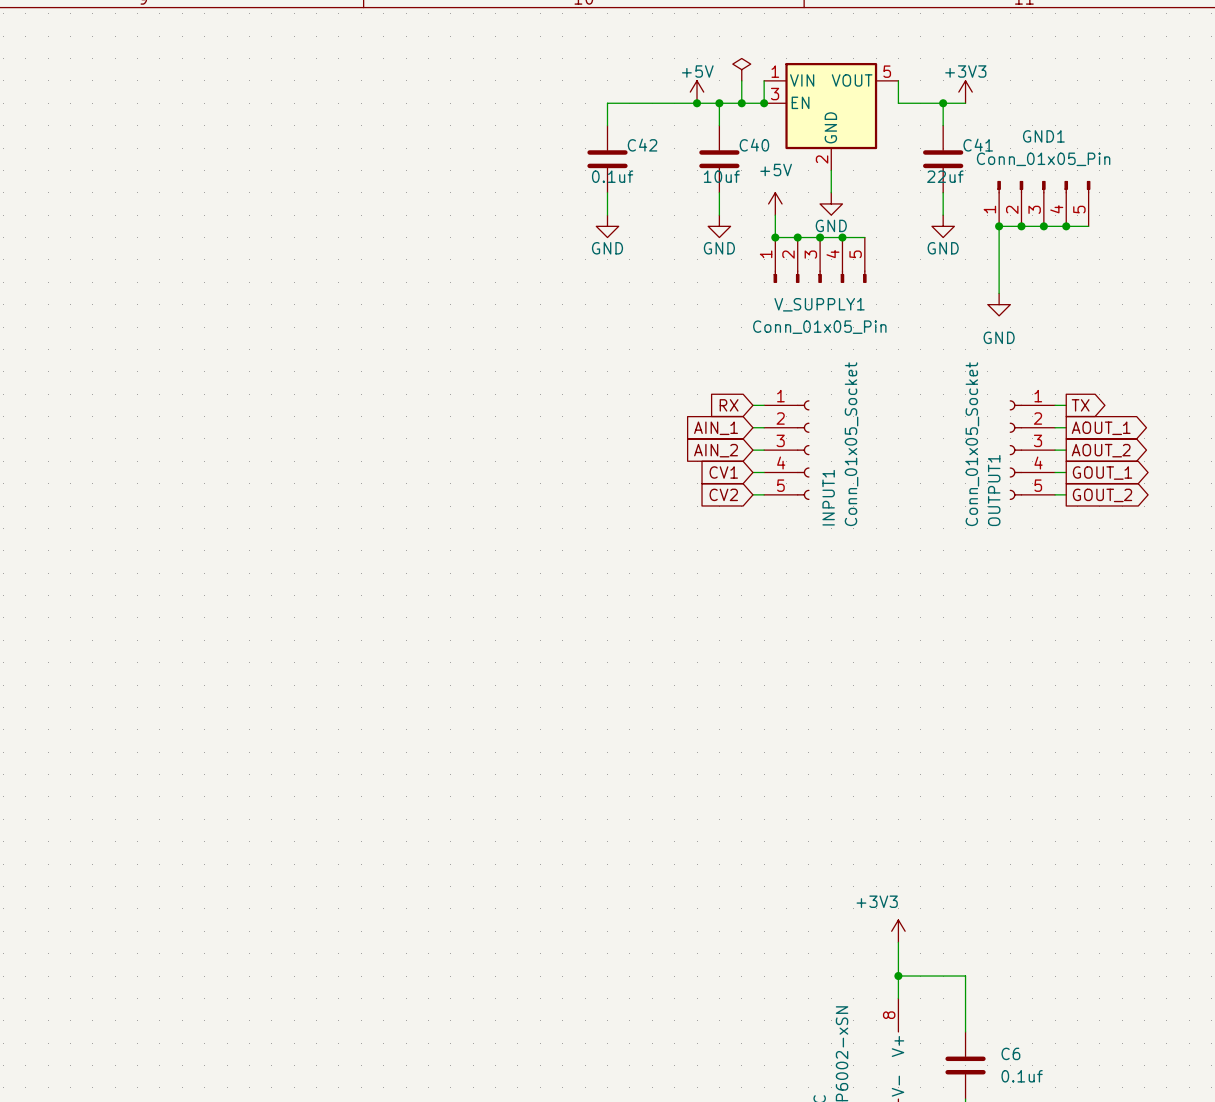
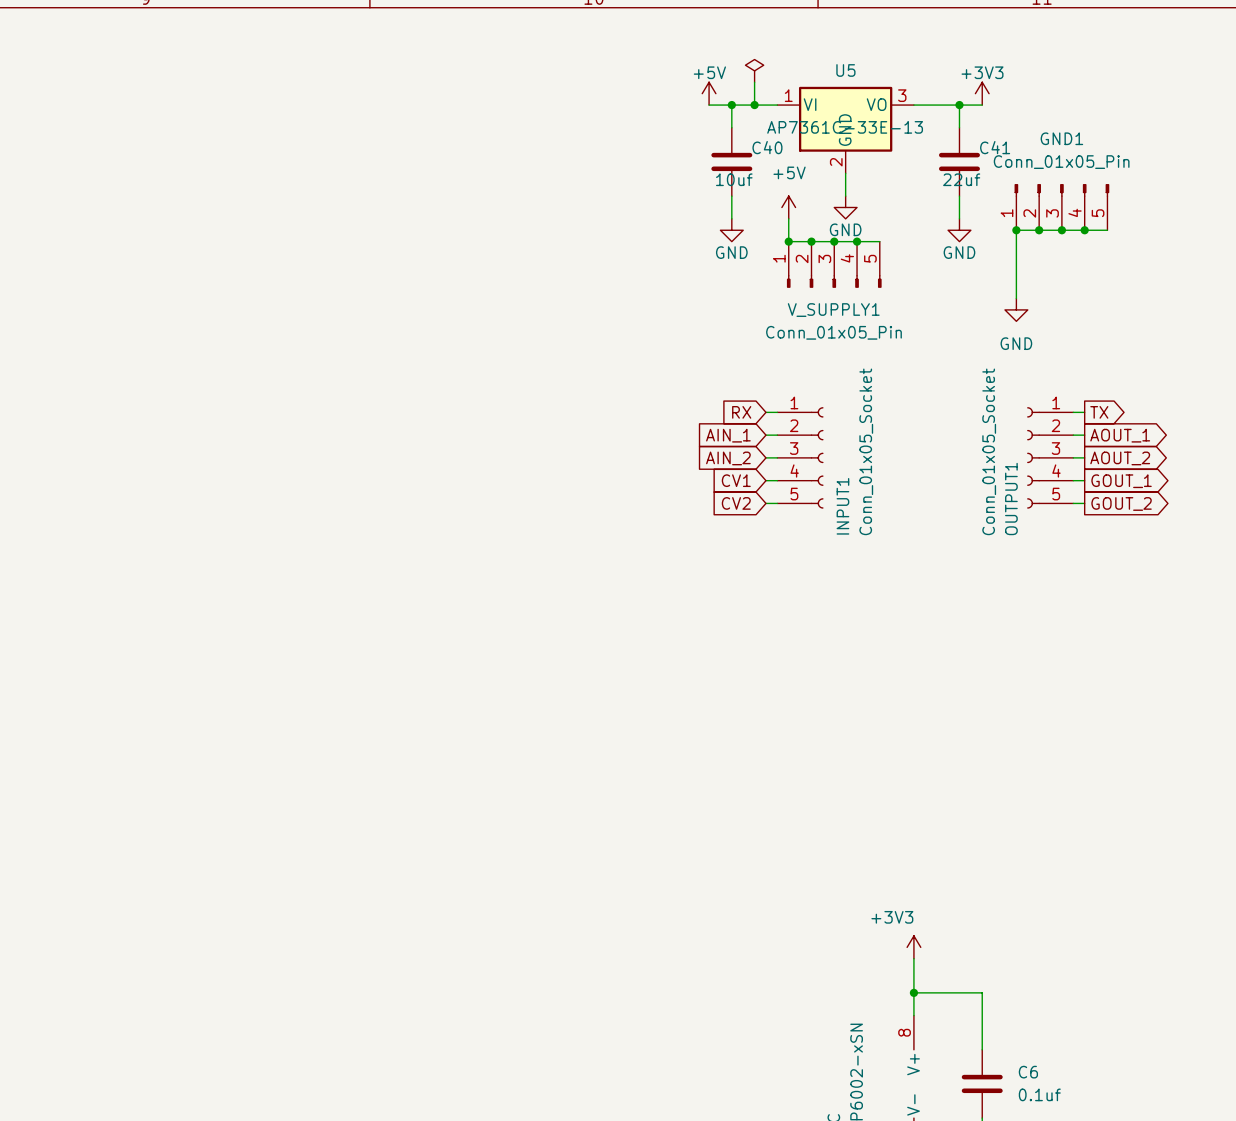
wire: (764, 80) (764, 103) -> none
wire: (898, 80) (898, 103) -> none
wire: (697, 103) (607, 103) (607, 125) -> none
junction: (697, 103) -> none
junction: (764, 103) -> none
part: (831, 116) -> none
U5: none -> AP7361C-33E-13 (845, 130)
C42: 0.1uf (607, 159) -> none
wire: (607, 192) (607, 215) -> none
power symbol: GND (607, 226) -> none

